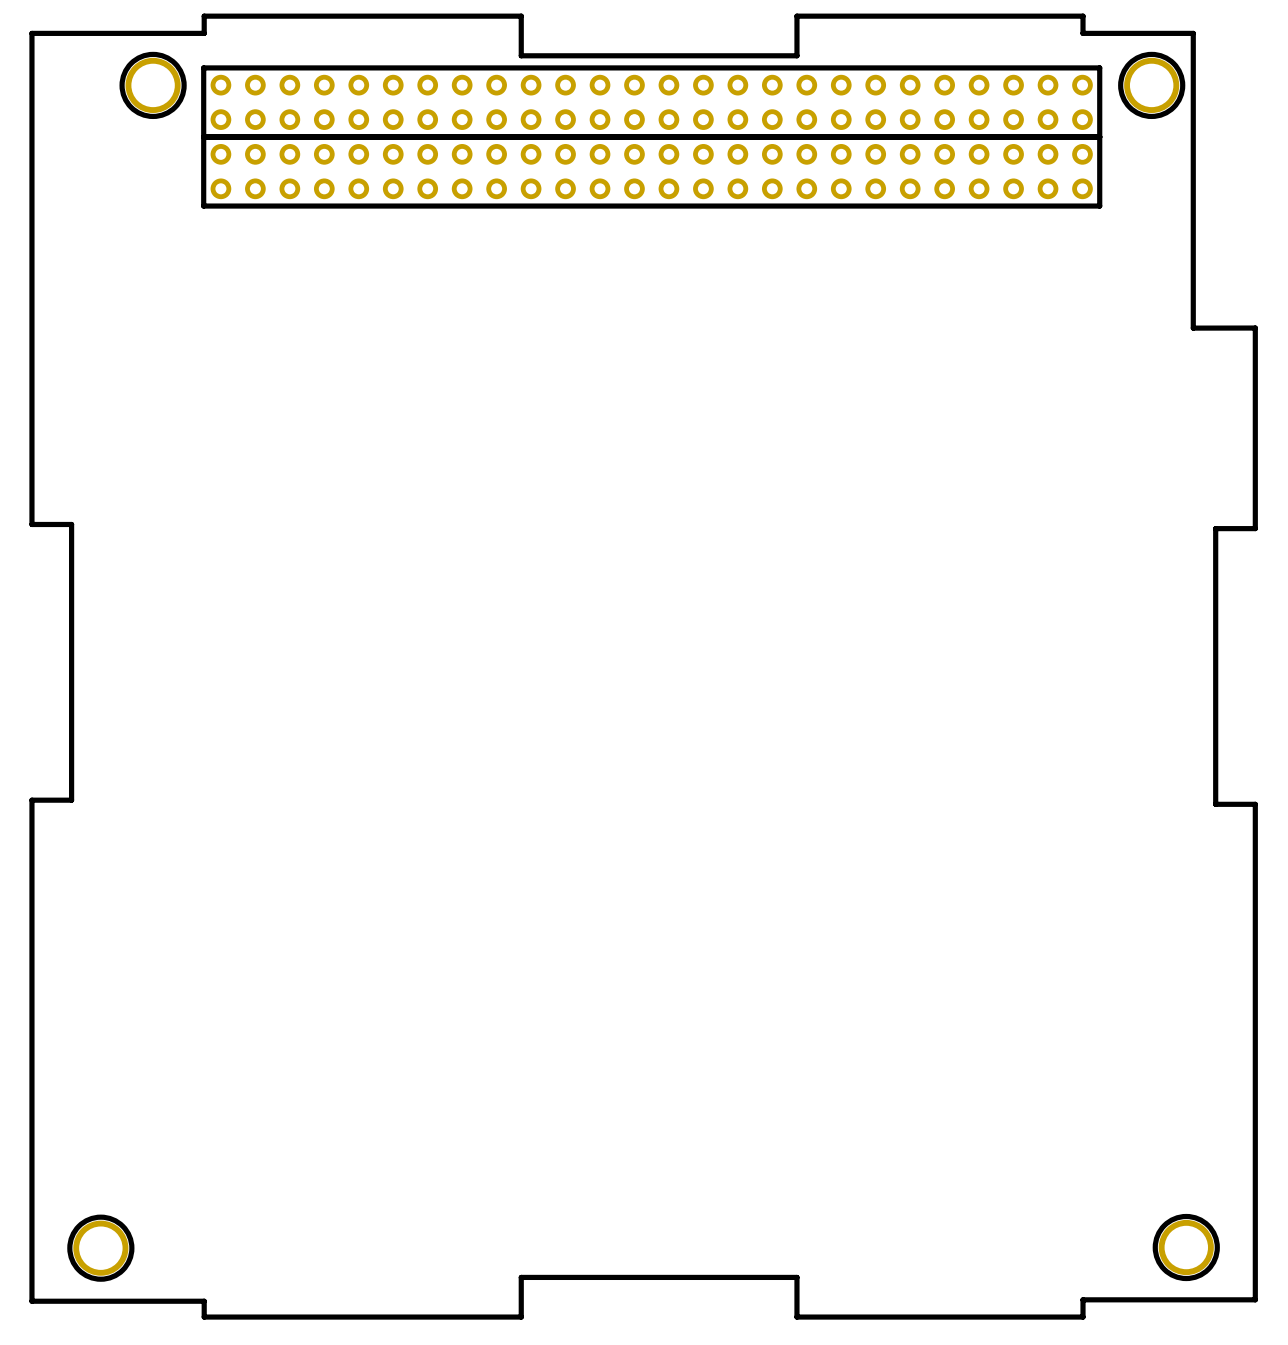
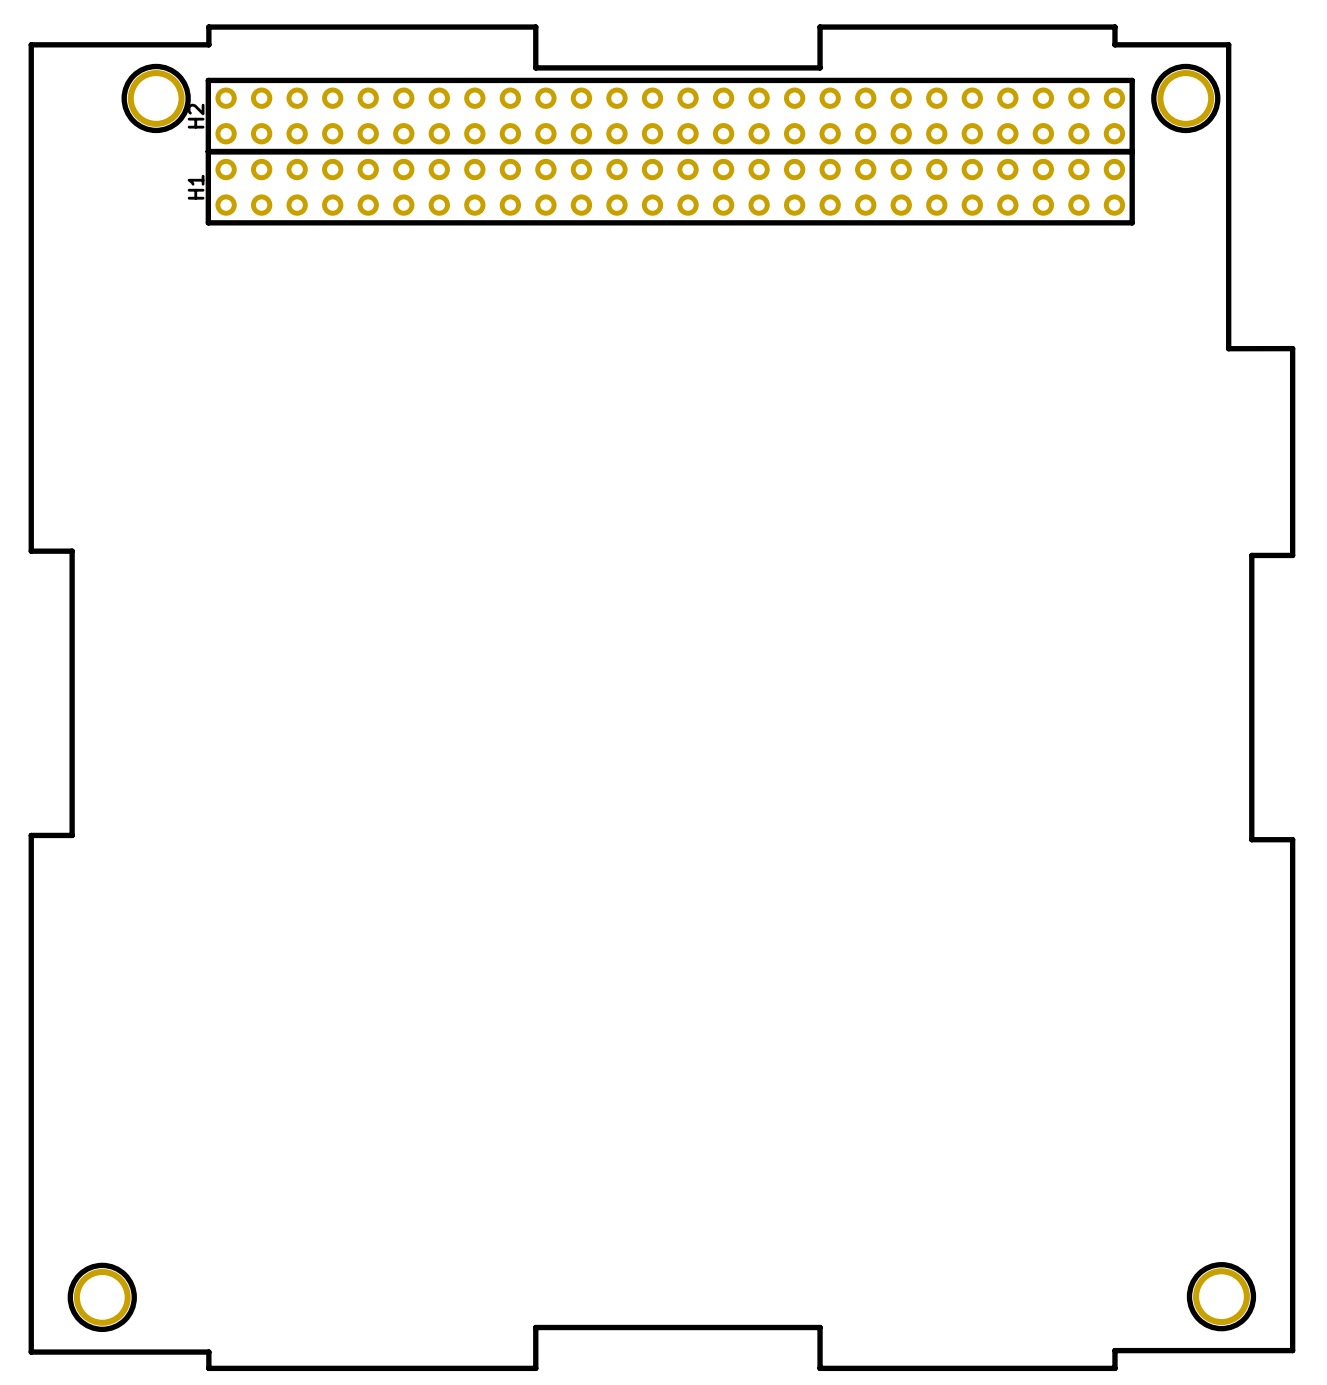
part value: none -> H2 (196, 116)
part value: none -> H1 (196, 187)

